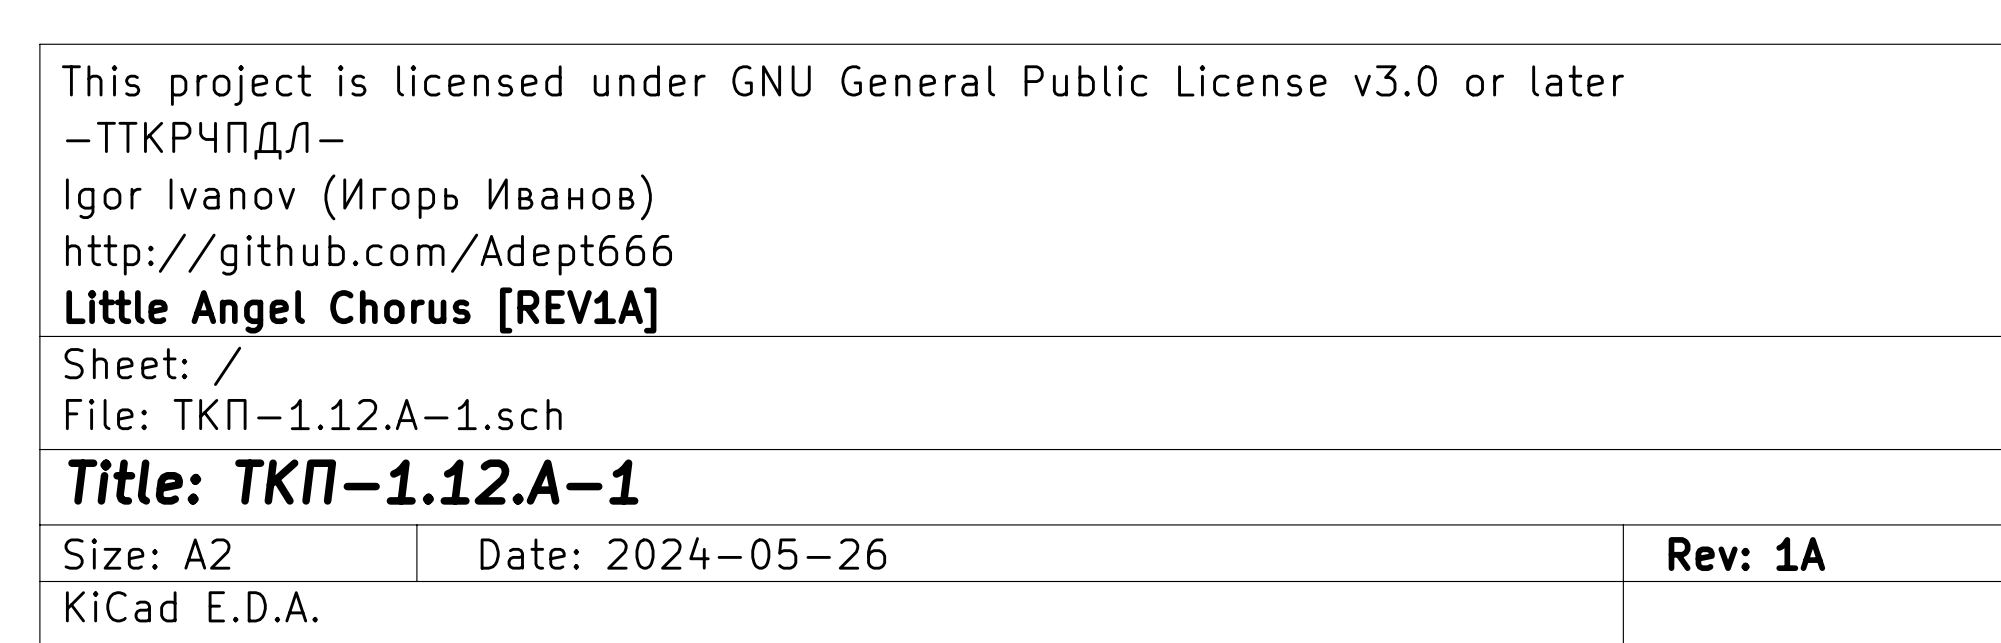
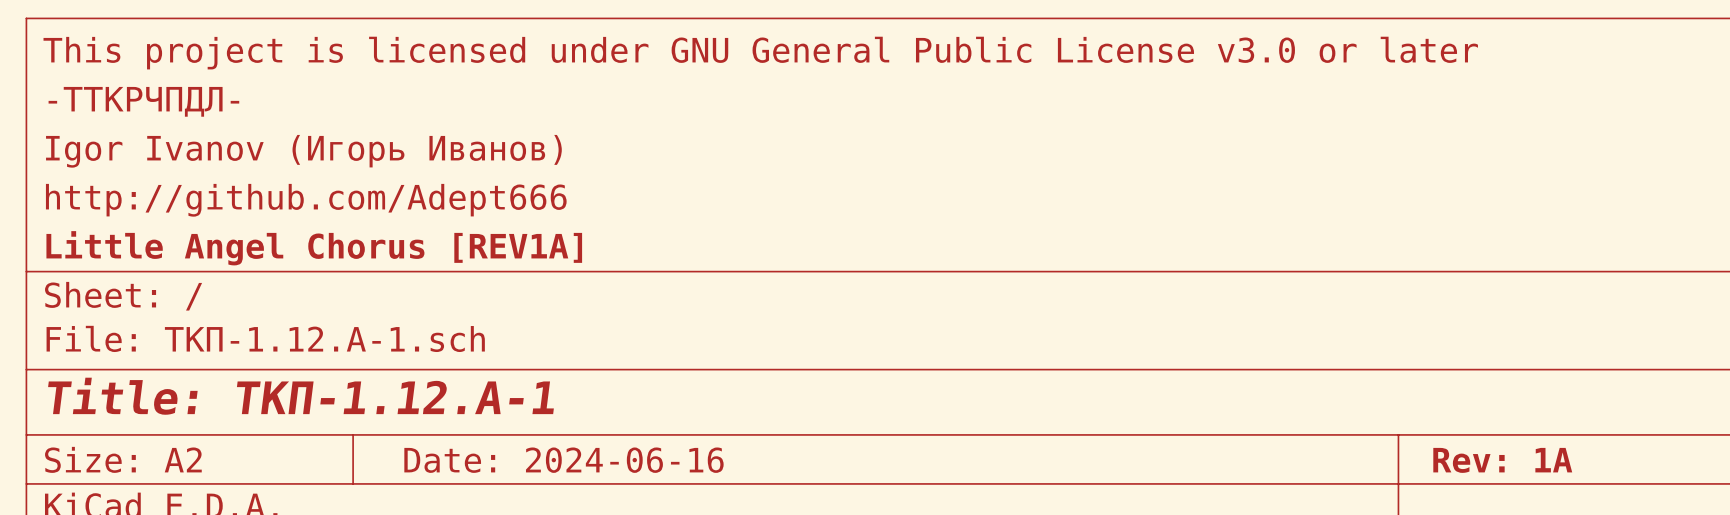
title block: Date: 2024-05-26 (683, 553) -> Date: 2024-06-16 (563, 460)

